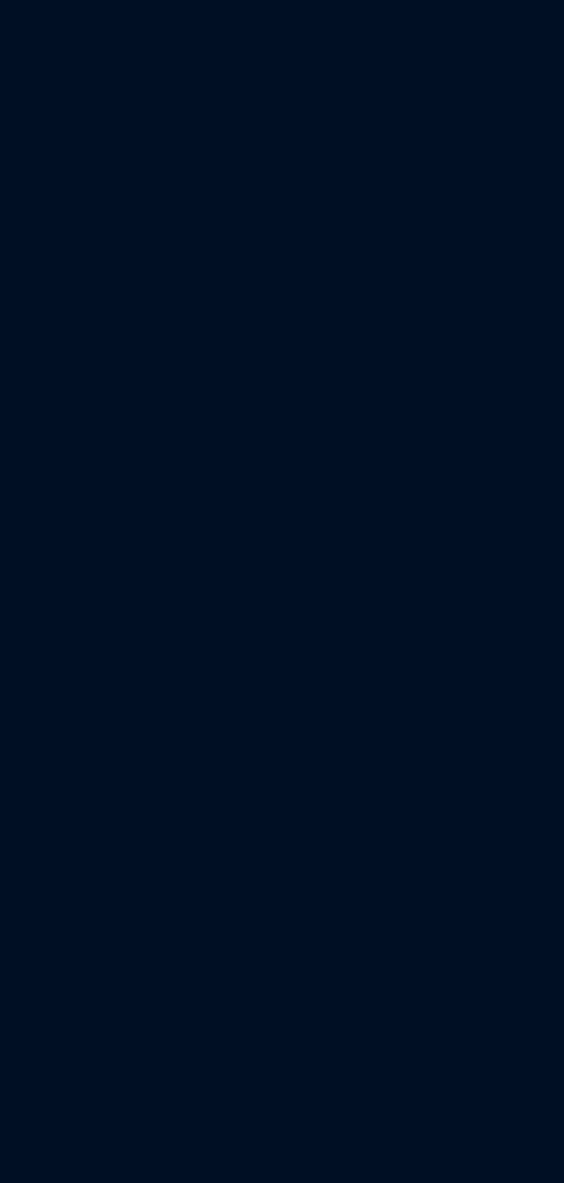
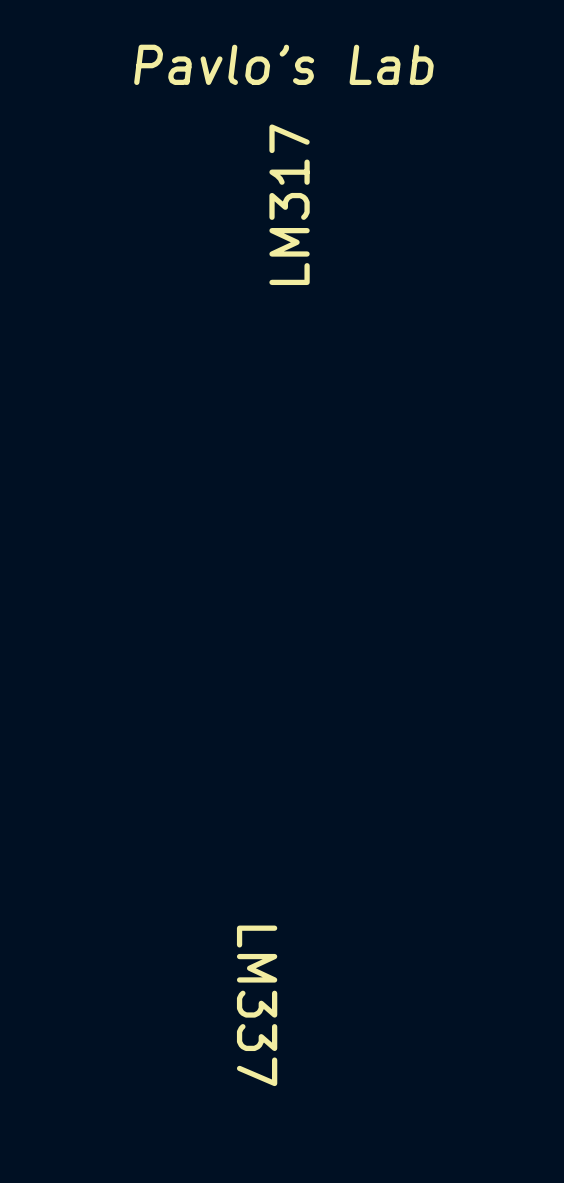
text: none -> Pavlo’s Lab (283, 64)
text: none -> LM317 (289, 204)
text: none -> LM337 (257, 1005)

